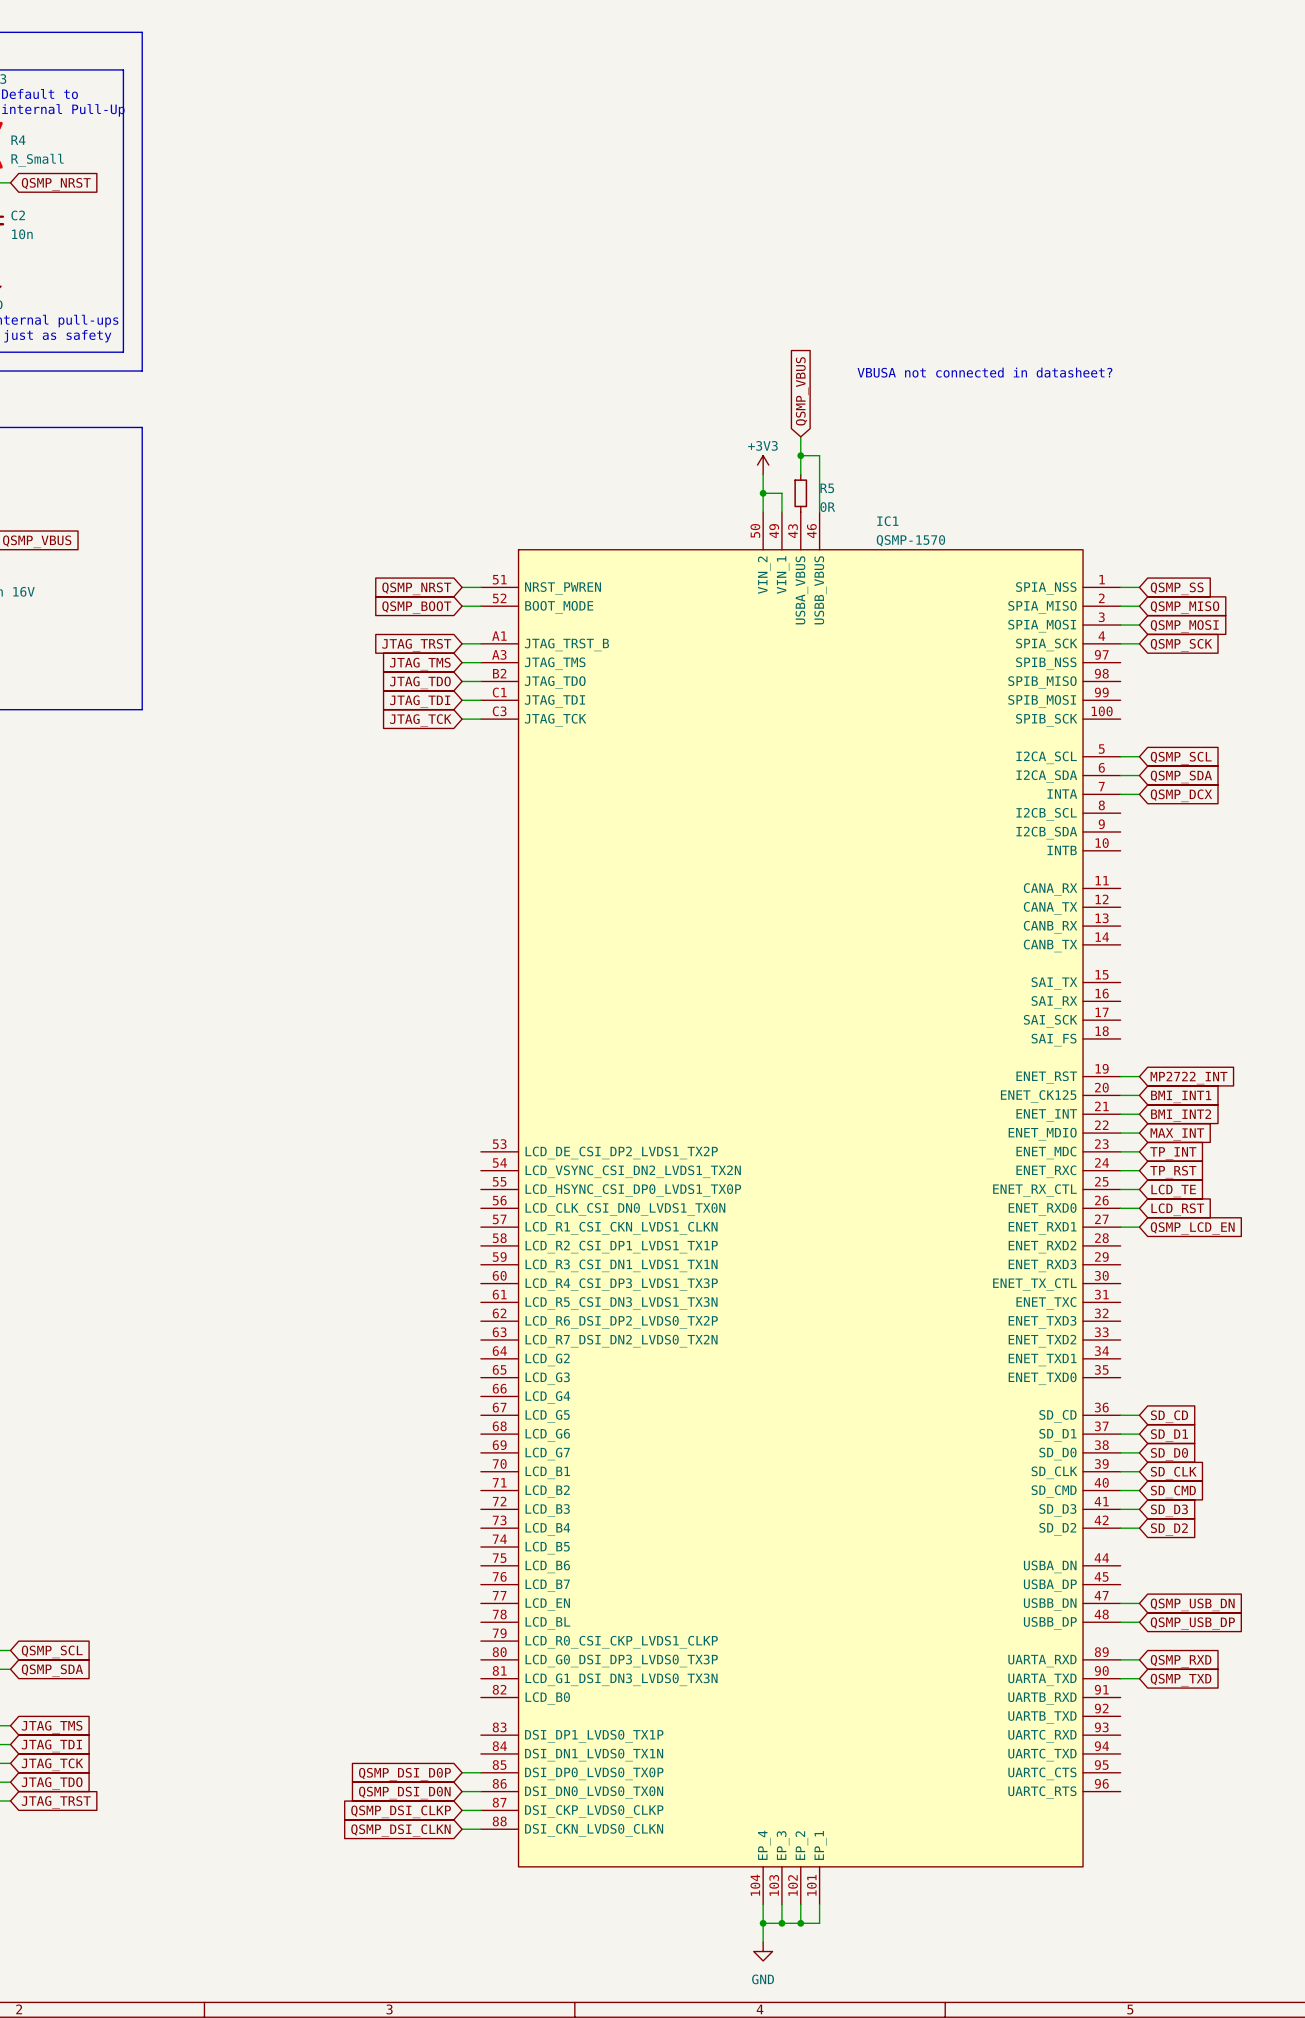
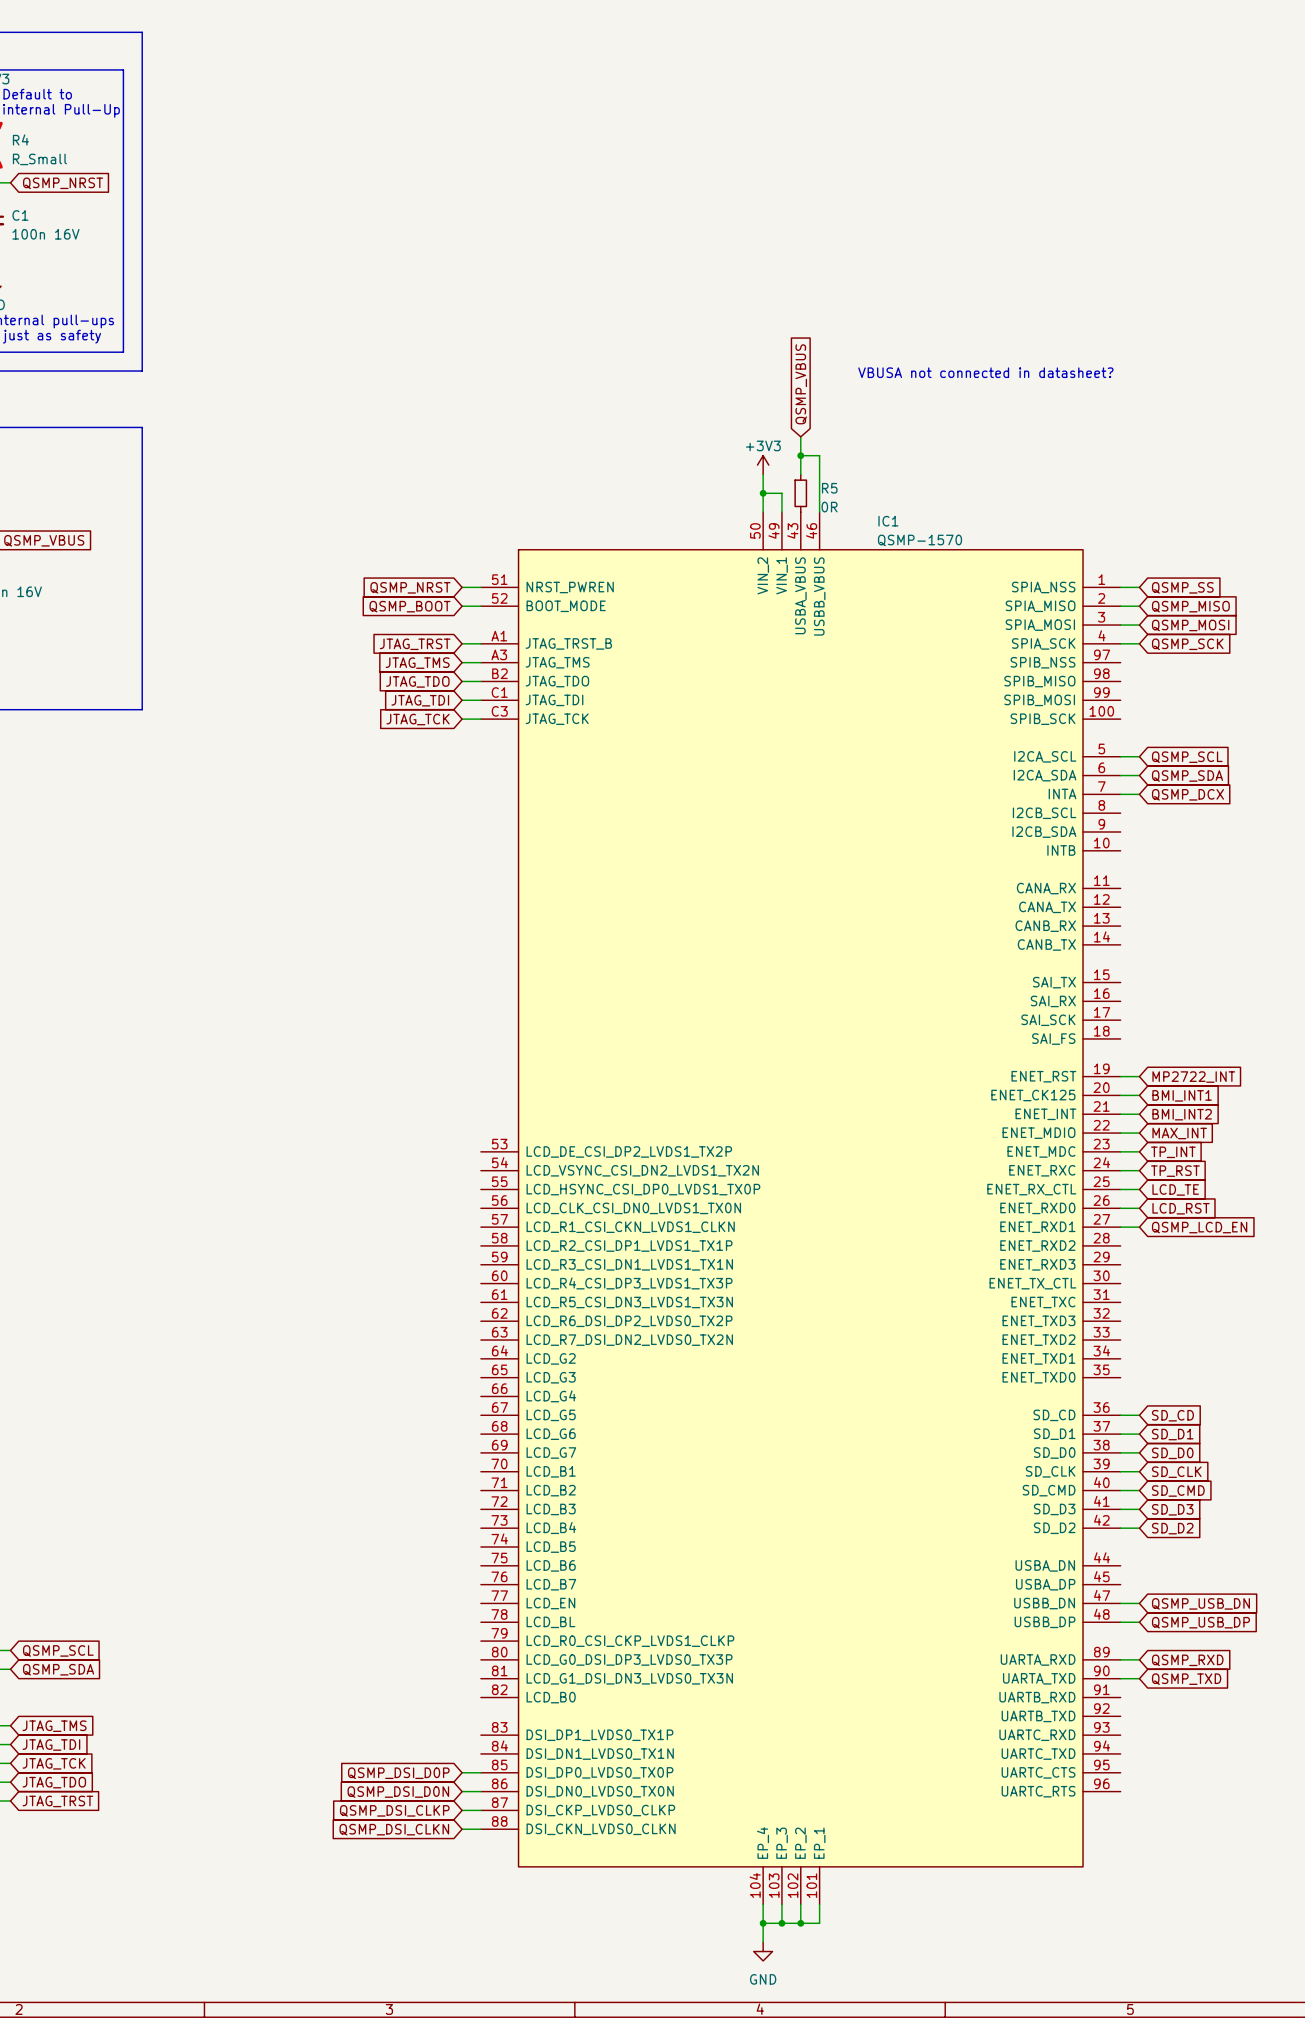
C2 name: C2 (18, 215) -> C1 (20, 215)
C2 value: 10n (22, 234) -> 100n 16V (45, 234)

